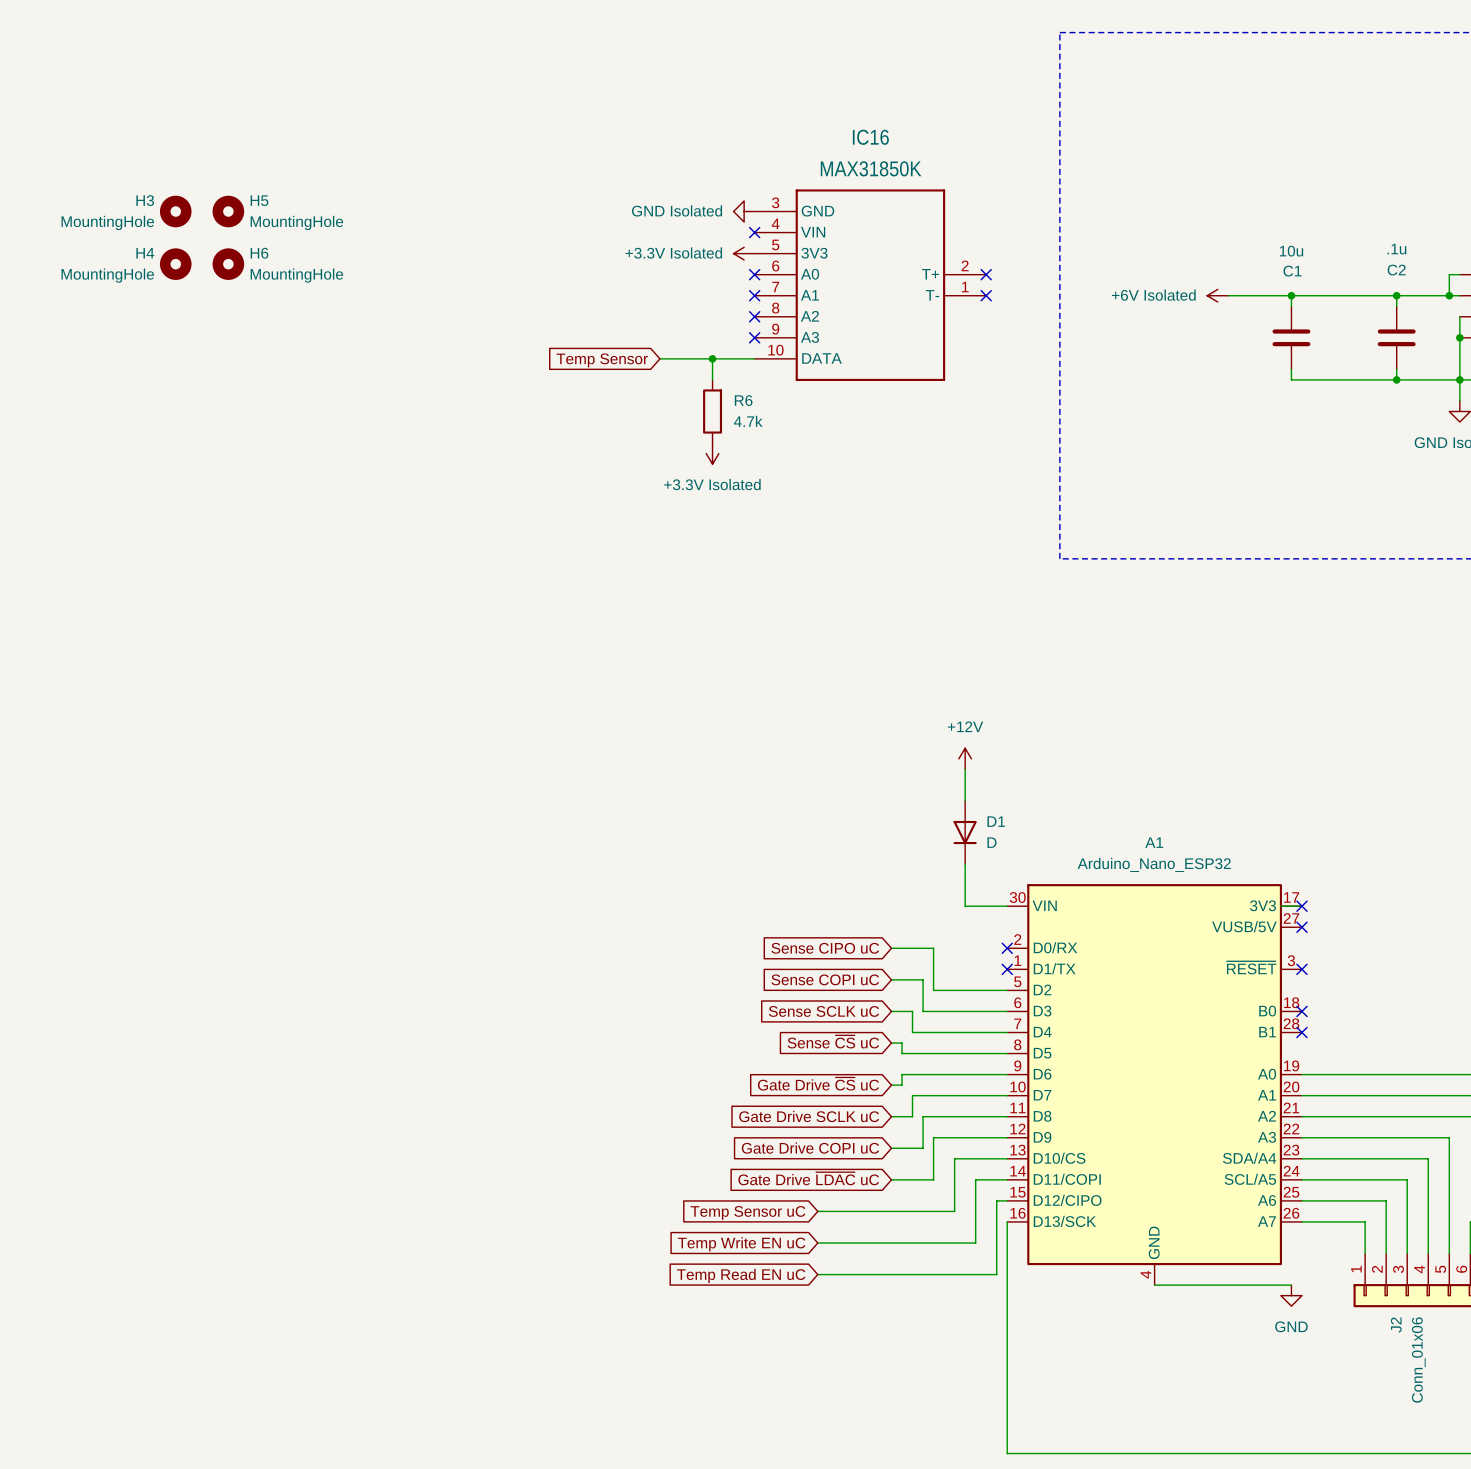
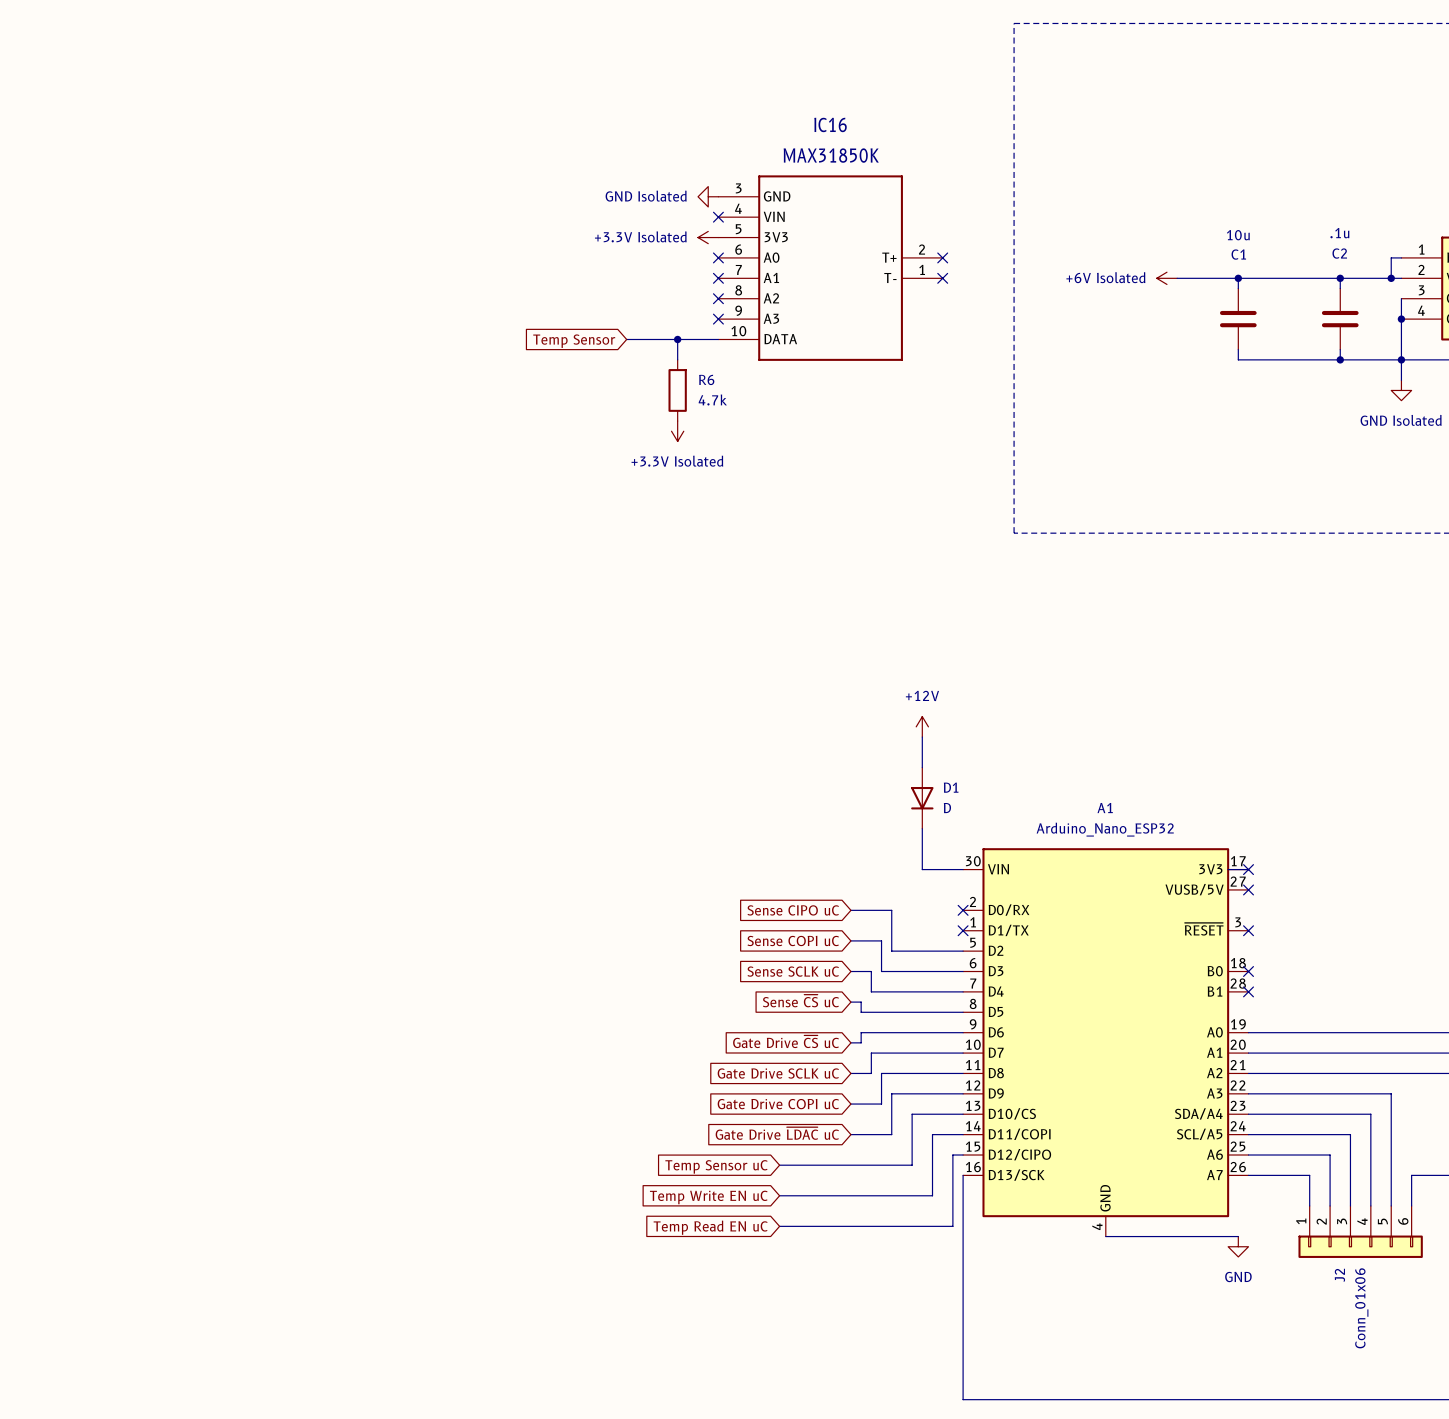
H3: MountingHole (175, 211) -> none
H5: MountingHole (228, 211) -> none
H4: MountingHole (175, 264) -> none
H6: MountingHole (228, 264) -> none

